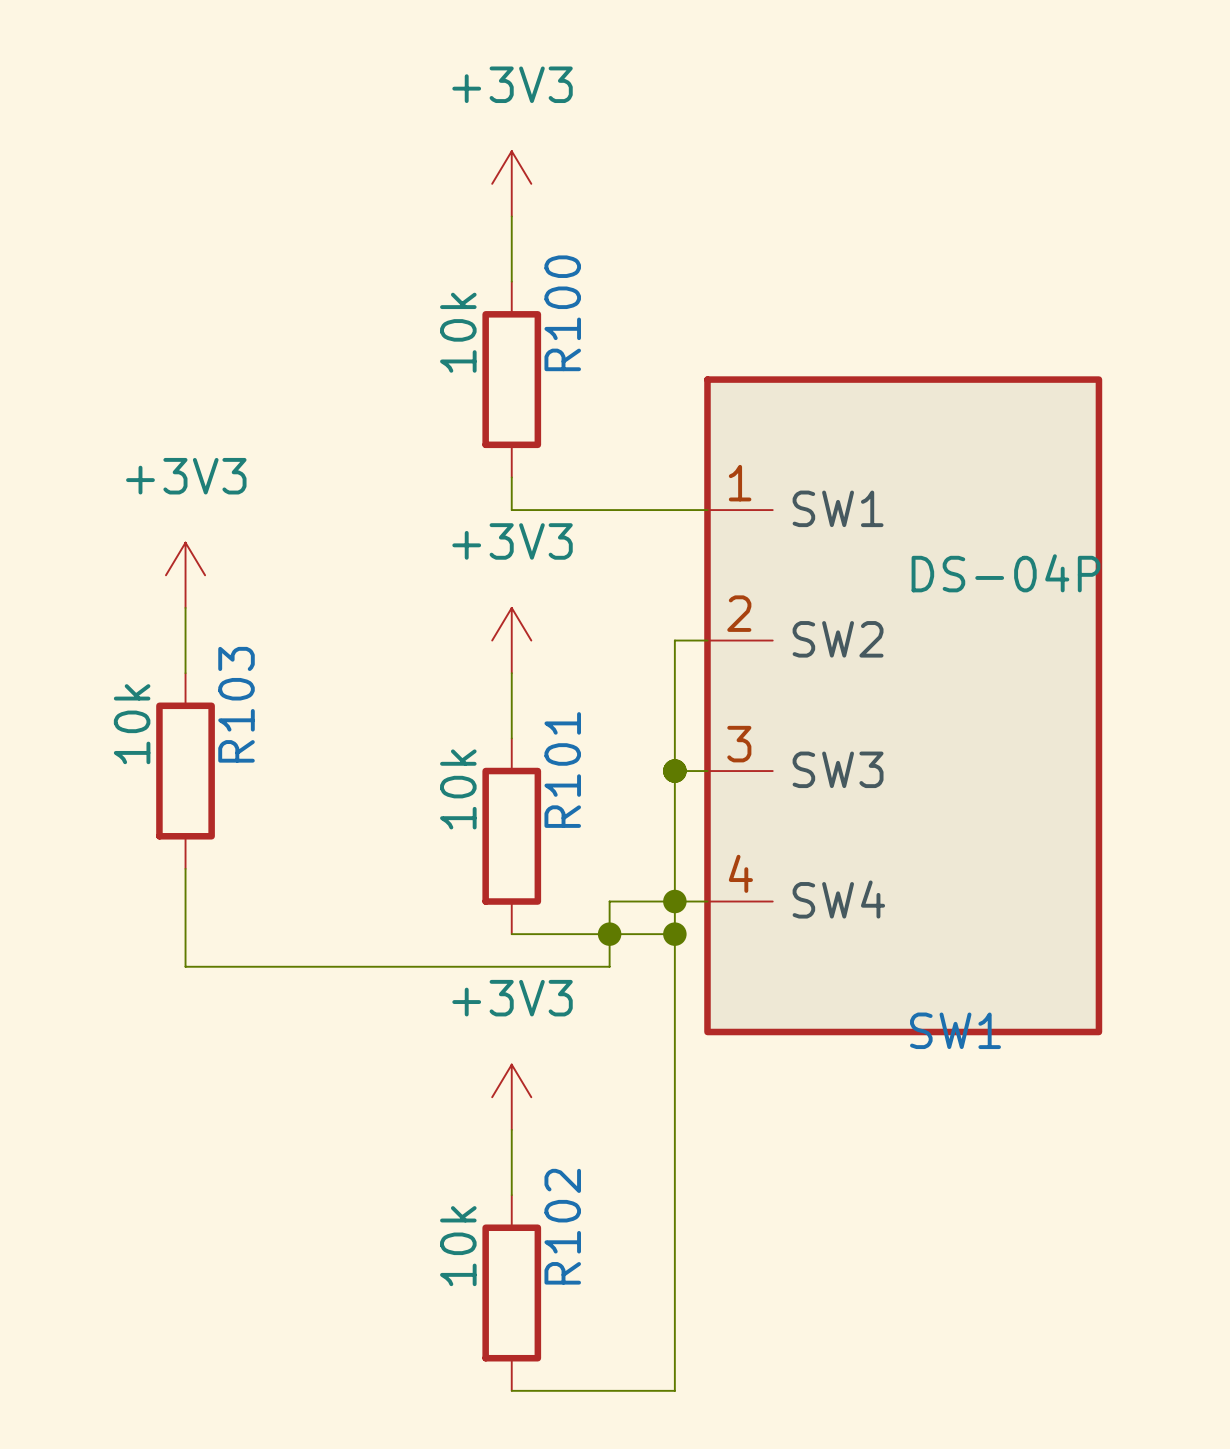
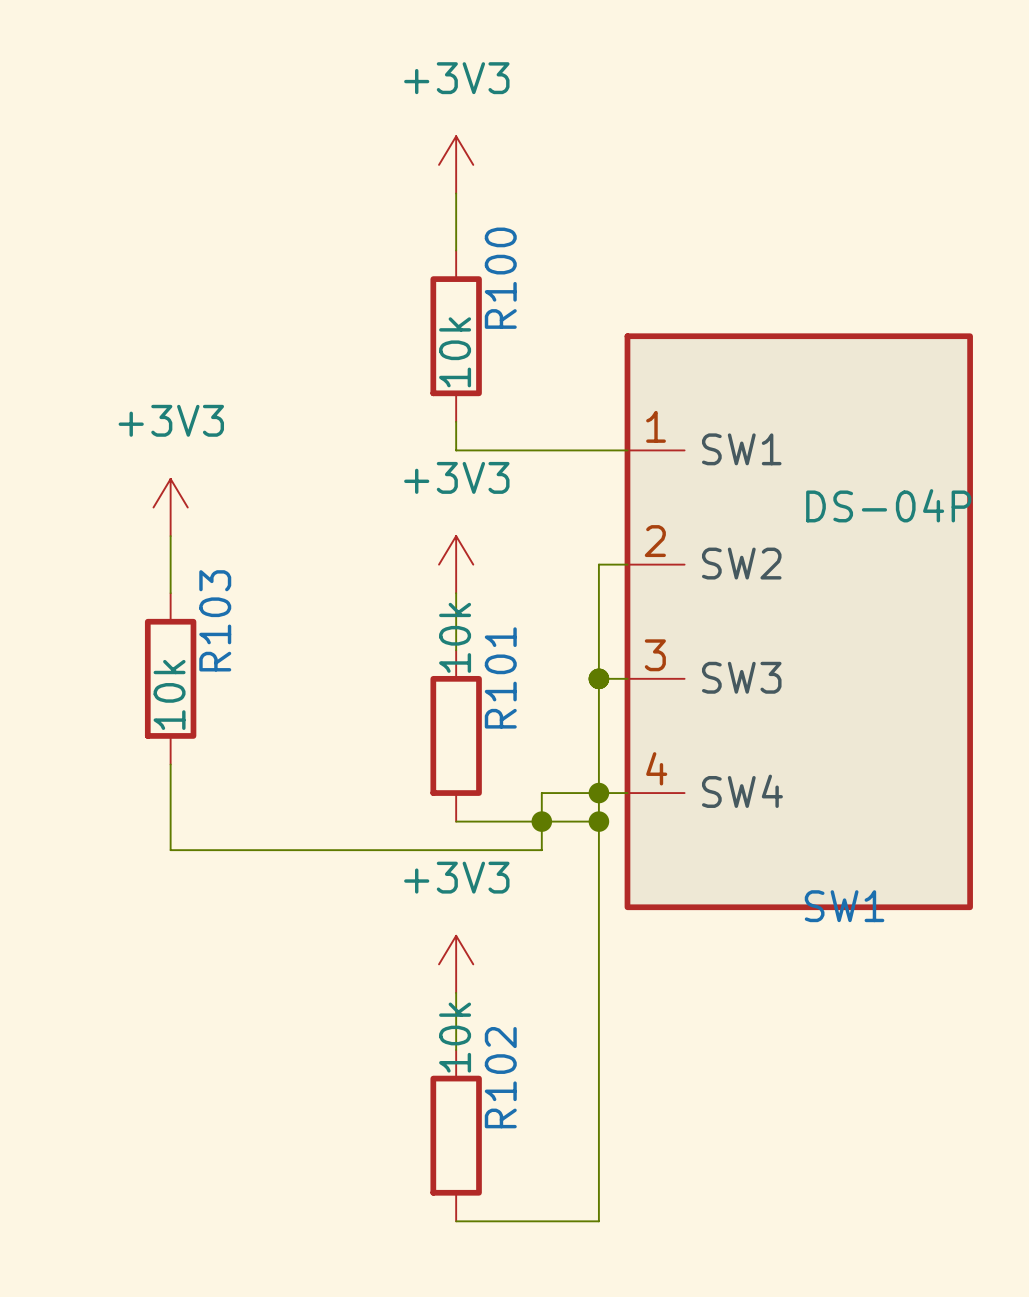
R100 value position: 10k (458, 332) -> 10k (455, 352)
R103 value position: 10k (132, 724) -> 10k (169, 694)
R101 value position: 10k (458, 789) -> 10k (455, 637)
R102 value position: 10k (458, 1246) -> 10k (455, 1037)

